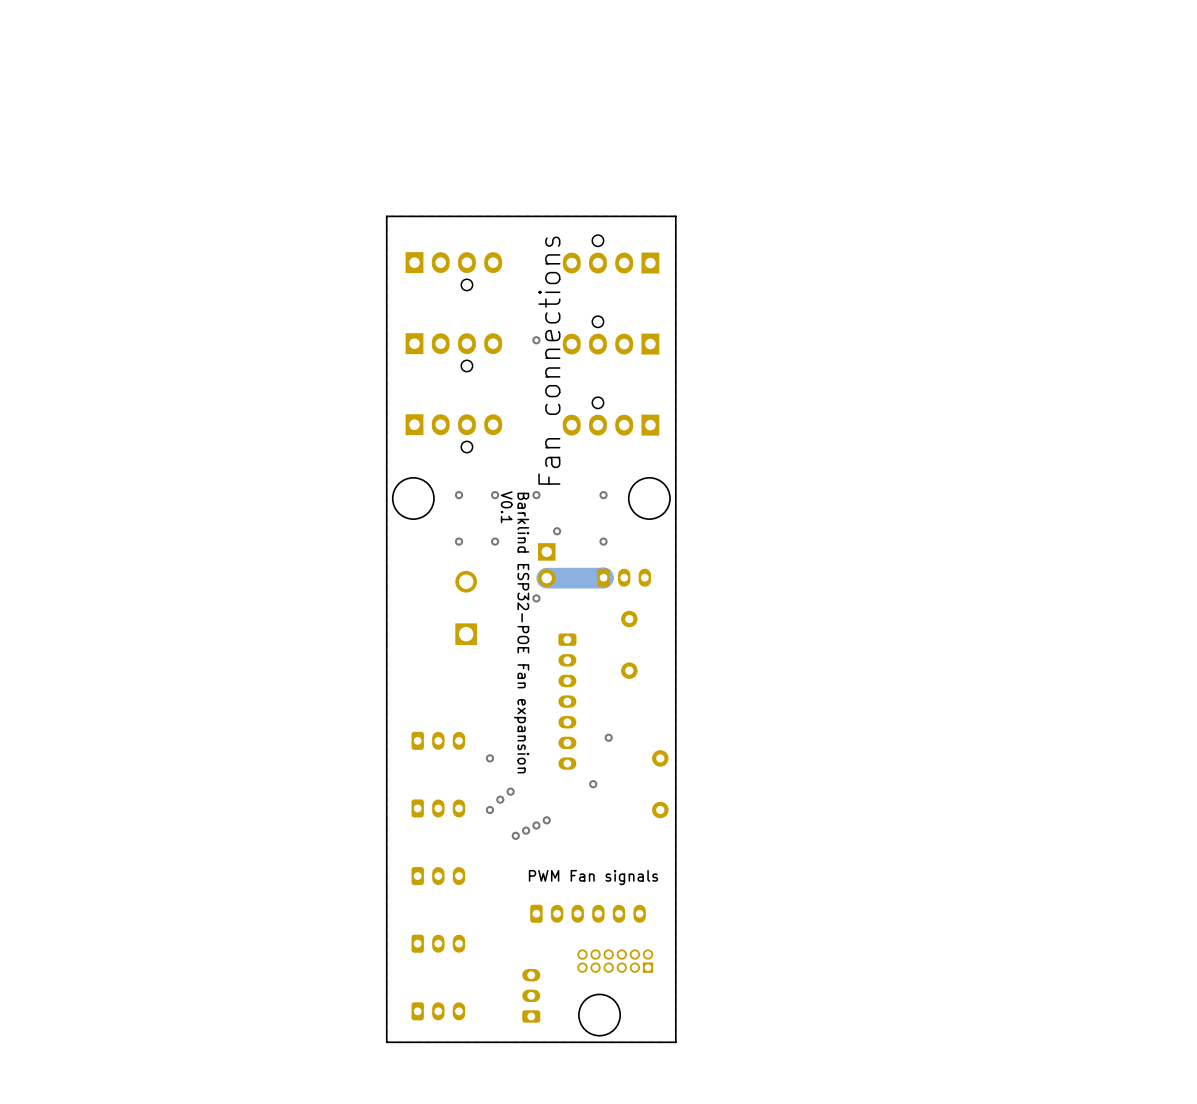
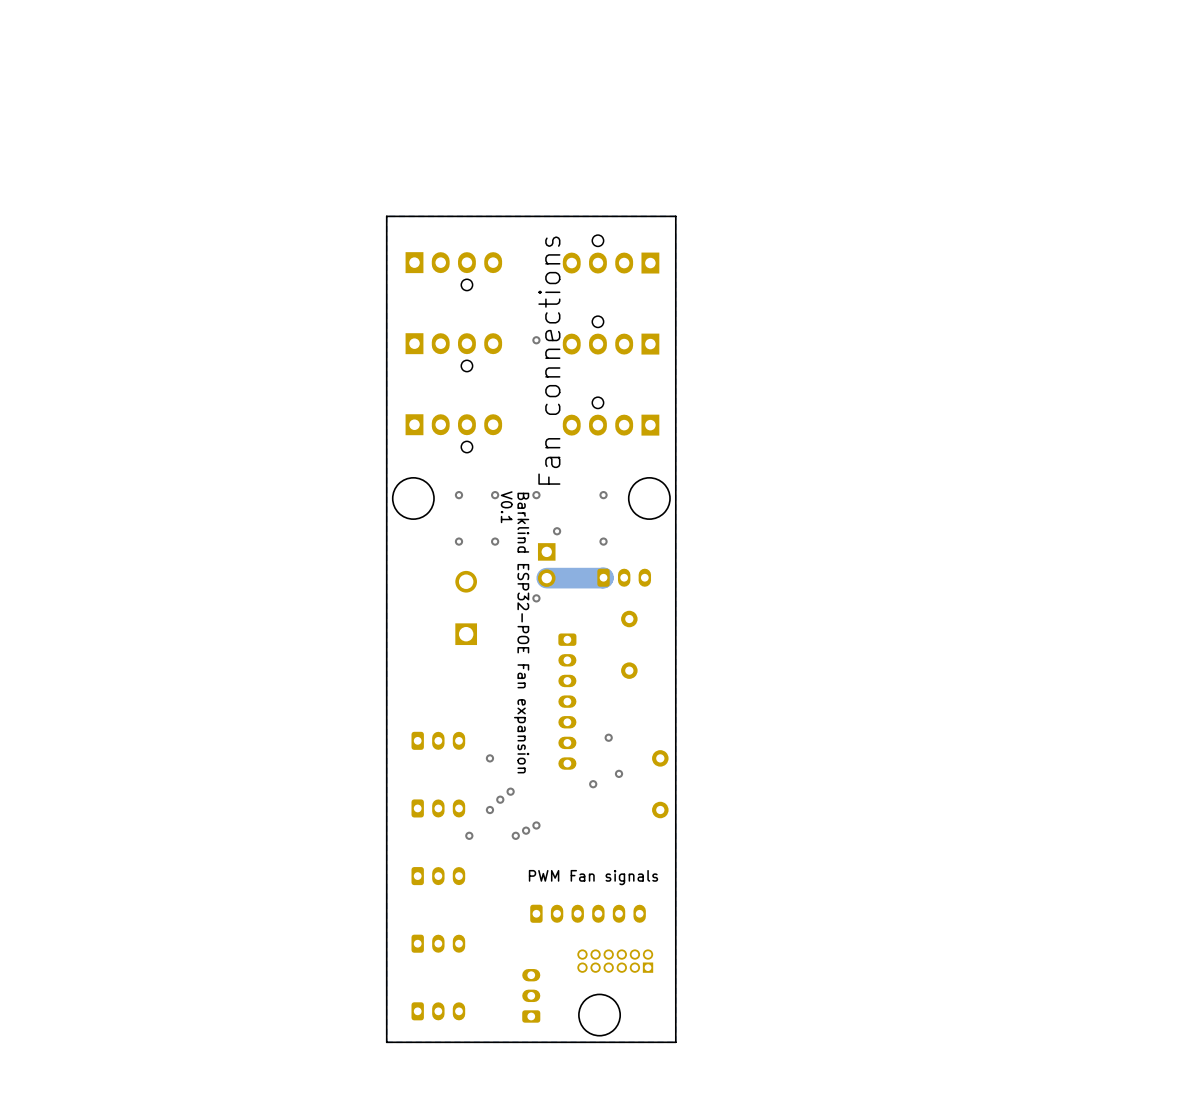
via: none -> (619, 773)
via: (546, 820) -> none
via: none -> (469, 835)

